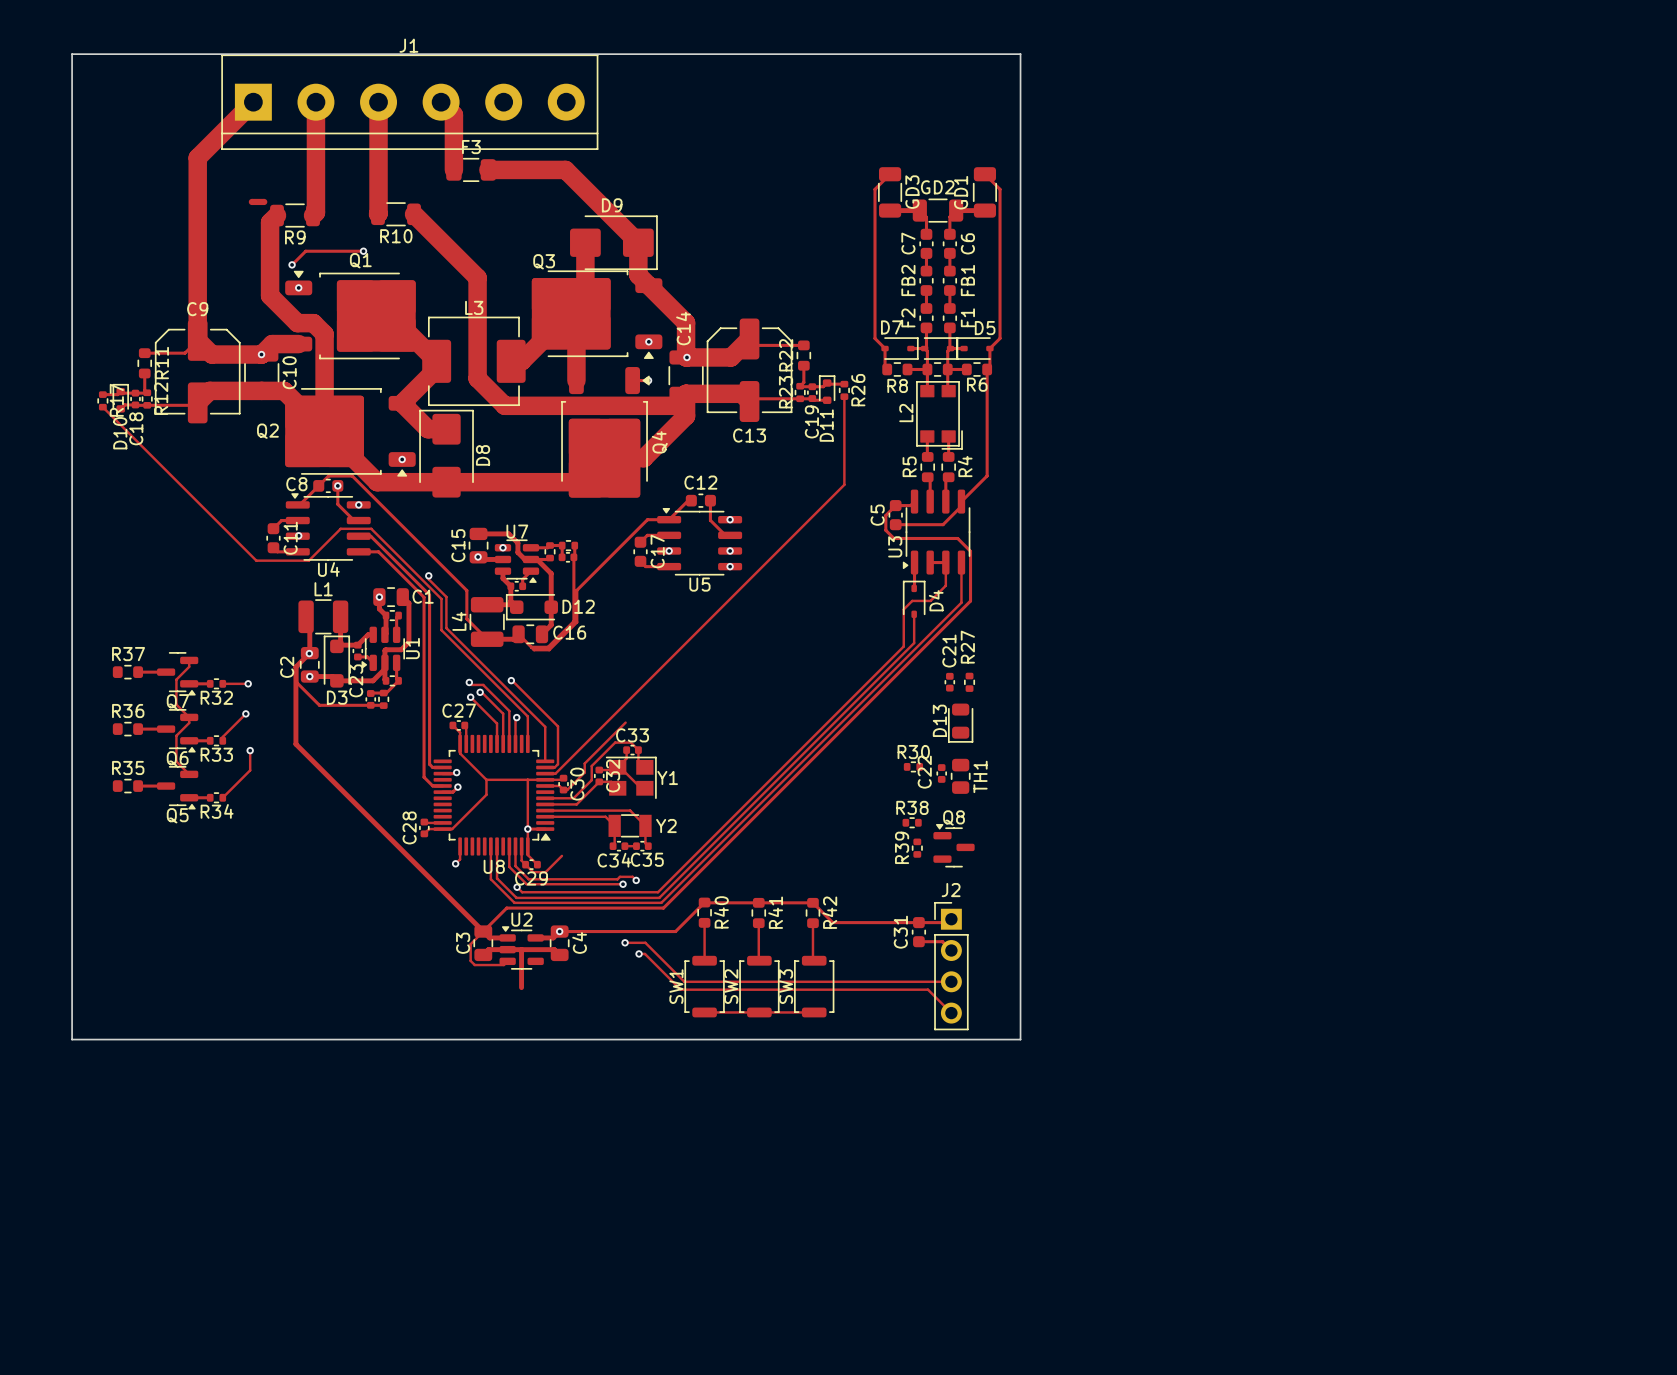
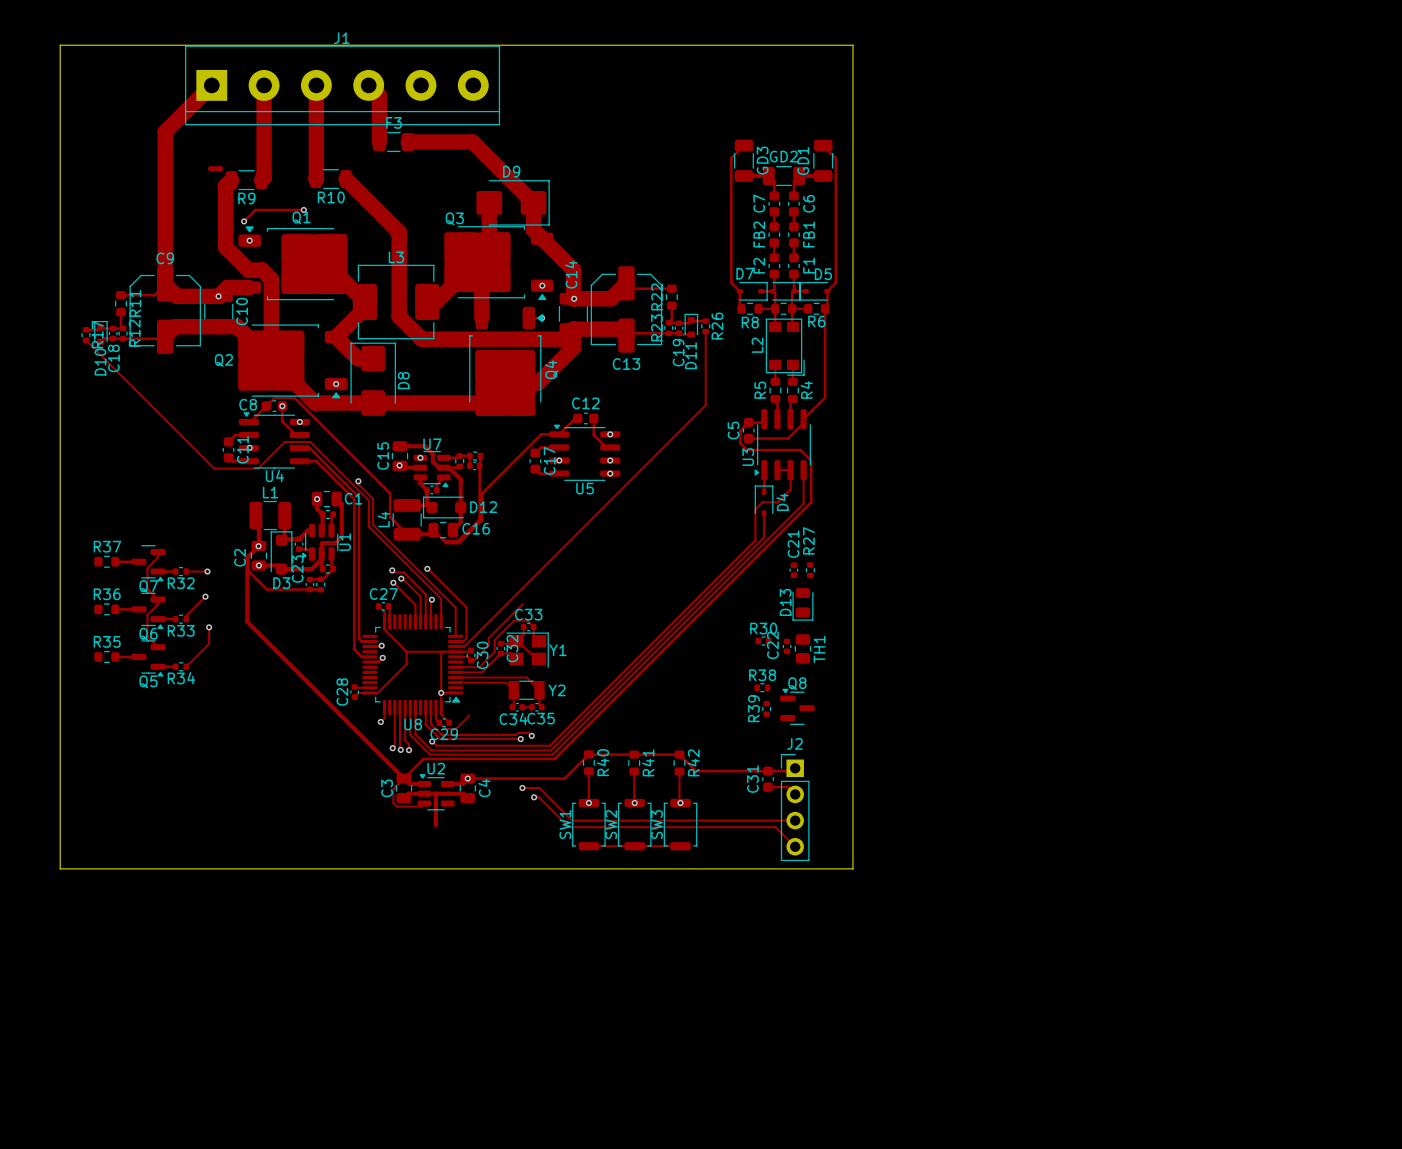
track: none -> (394, 707) (394, 746) (392, 748)
track: none -> (399, 707) (400, 749)
track: none -> (405, 707) (405, 740) (409, 744) (409, 750)
via: none -> (392, 748)
via: none -> (400, 749)
via: none -> (409, 750)
via: none -> (588, 802)
via: none -> (634, 802)
via: none -> (680, 802)

